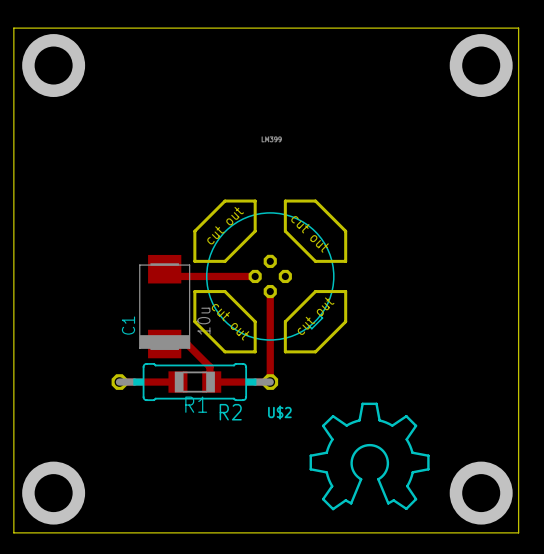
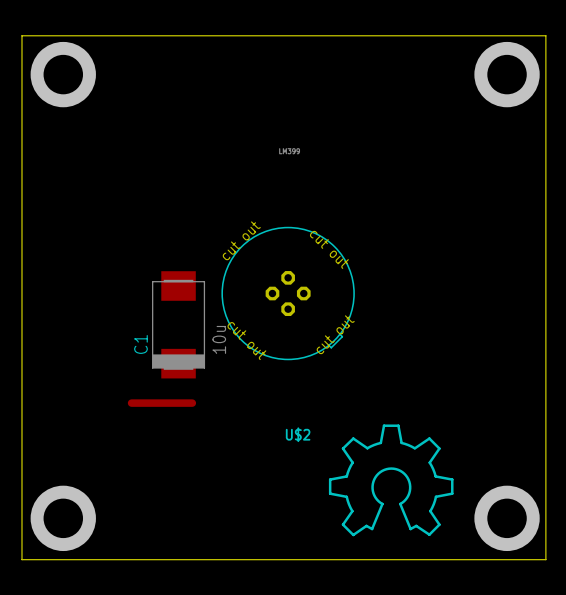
board edge: (225, 201) (255, 201) (255, 231) (225, 261) (194, 261) (194, 231) (225, 201) -> none
board edge: (285, 201) (315, 201) (345, 231) (345, 261) (315, 261) (285, 231) (285, 201) -> none
track: (164, 269) (171, 276) (255, 276) -> none
board edge: (194, 291) (194, 321) (225, 351) (255, 351) (255, 321) (225, 291) (194, 291) -> none
track: (270, 291) (270, 382) (211, 382) (209, 380) (209, 366) (187, 344) (164, 344) -> none
board edge: (315, 291) (345, 291) (345, 321) (315, 351) (285, 351) (285, 321) (315, 291) -> none
R1: (194, 382) -> none
R2: (194, 382) -> none

